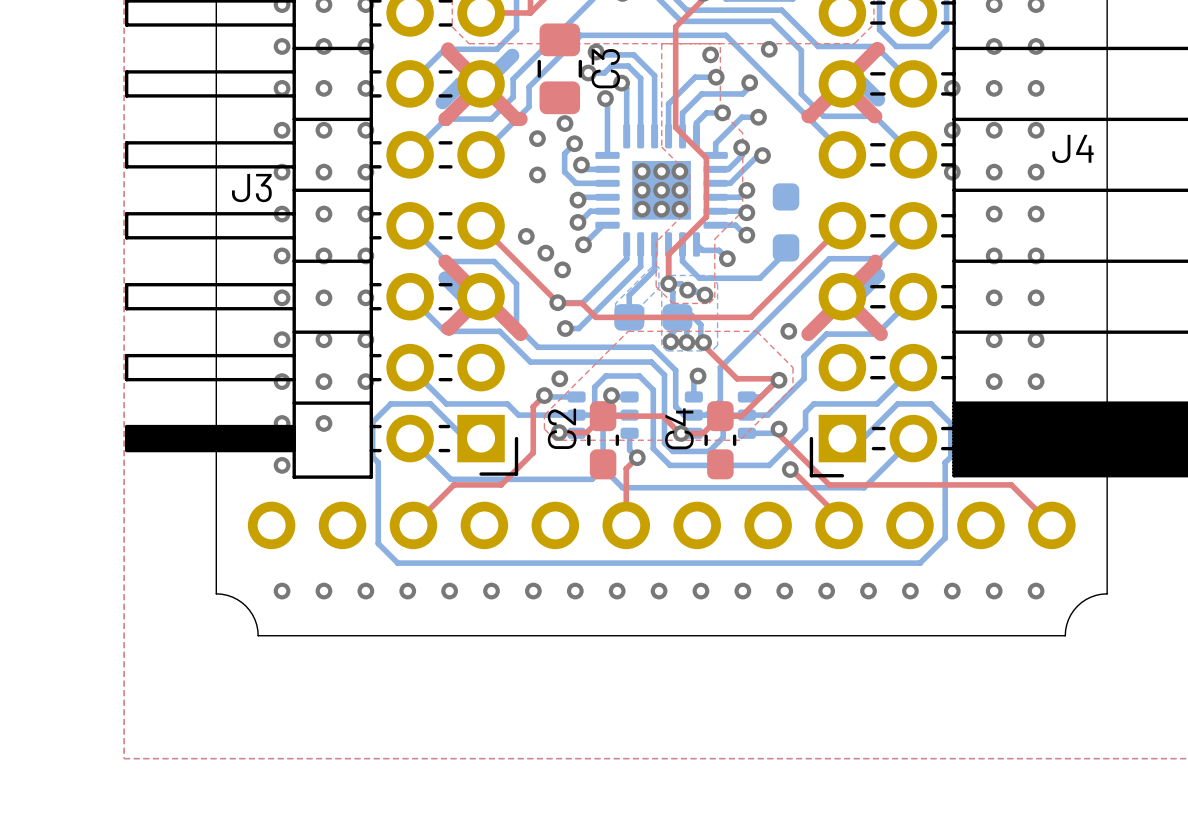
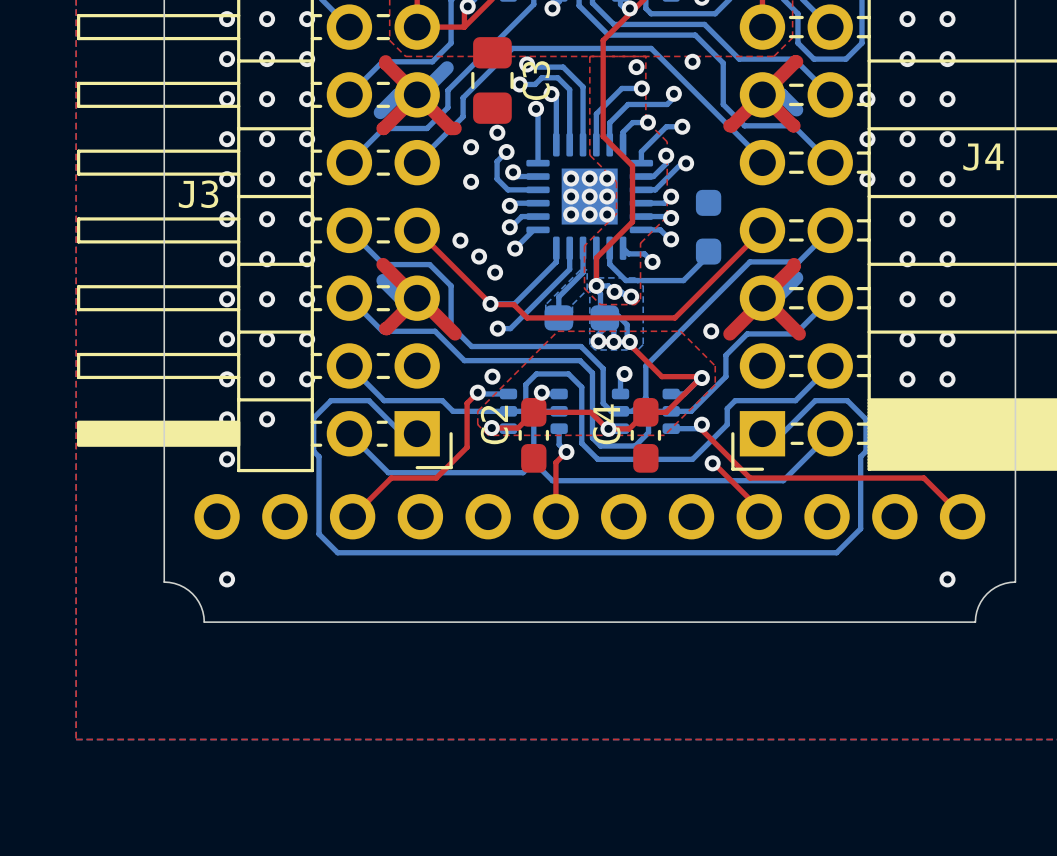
via: (323, 591) -> none
via: (365, 591) -> none
via: (407, 591) -> none
via: (449, 591) -> none
via: (491, 591) -> none
via: (533, 591) -> none
via: (575, 591) -> none
via: (617, 591) -> none
via: (659, 591) -> none
via: (700, 591) -> none
via: (742, 591) -> none
via: (784, 591) -> none
via: (826, 591) -> none
via: (868, 591) -> none
via: (910, 591) -> none
via: (952, 591) -> none
via: (994, 591) -> none

